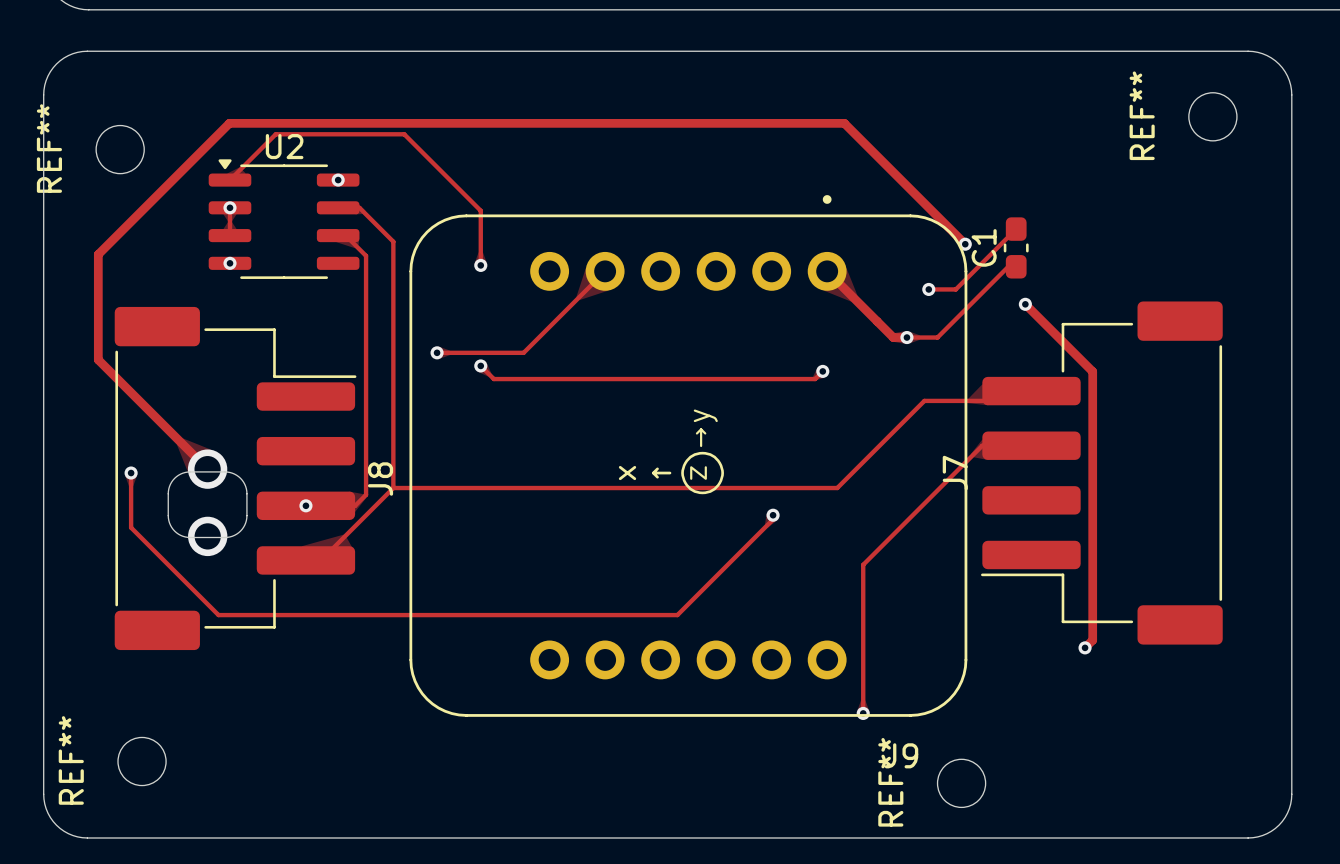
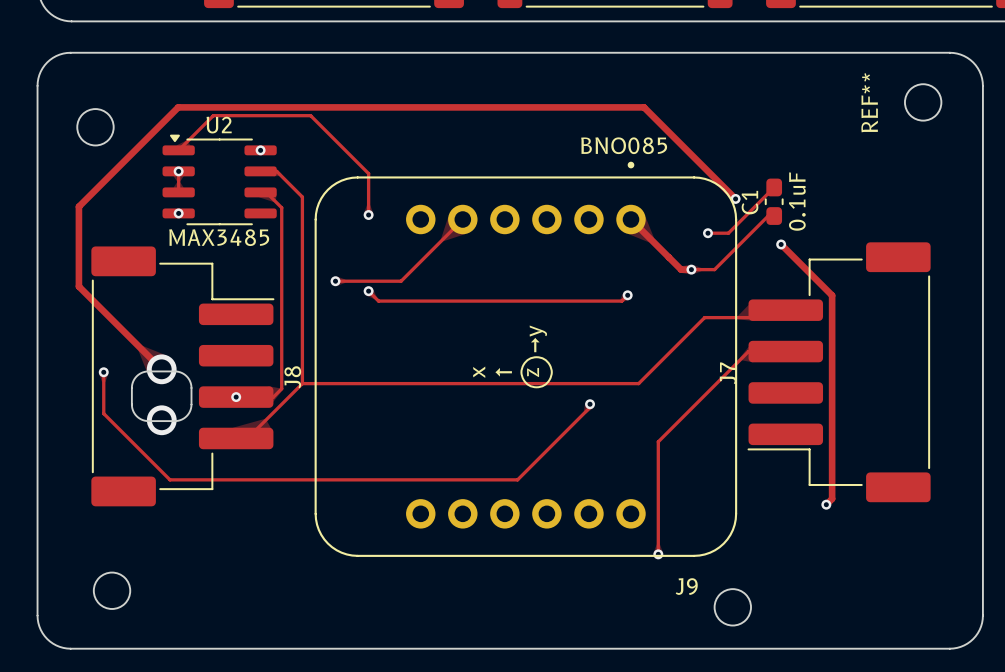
REF** name: REF** (49, 148) -> none
J9 value: none -> BNO085 (624, 145)
C1 value: none -> 0.1uF (797, 201)
U2 value: none -> MAX3485 (219, 237)
REF** name: REF** (71, 760) -> none
REF** name: REF** (890, 782) -> none

